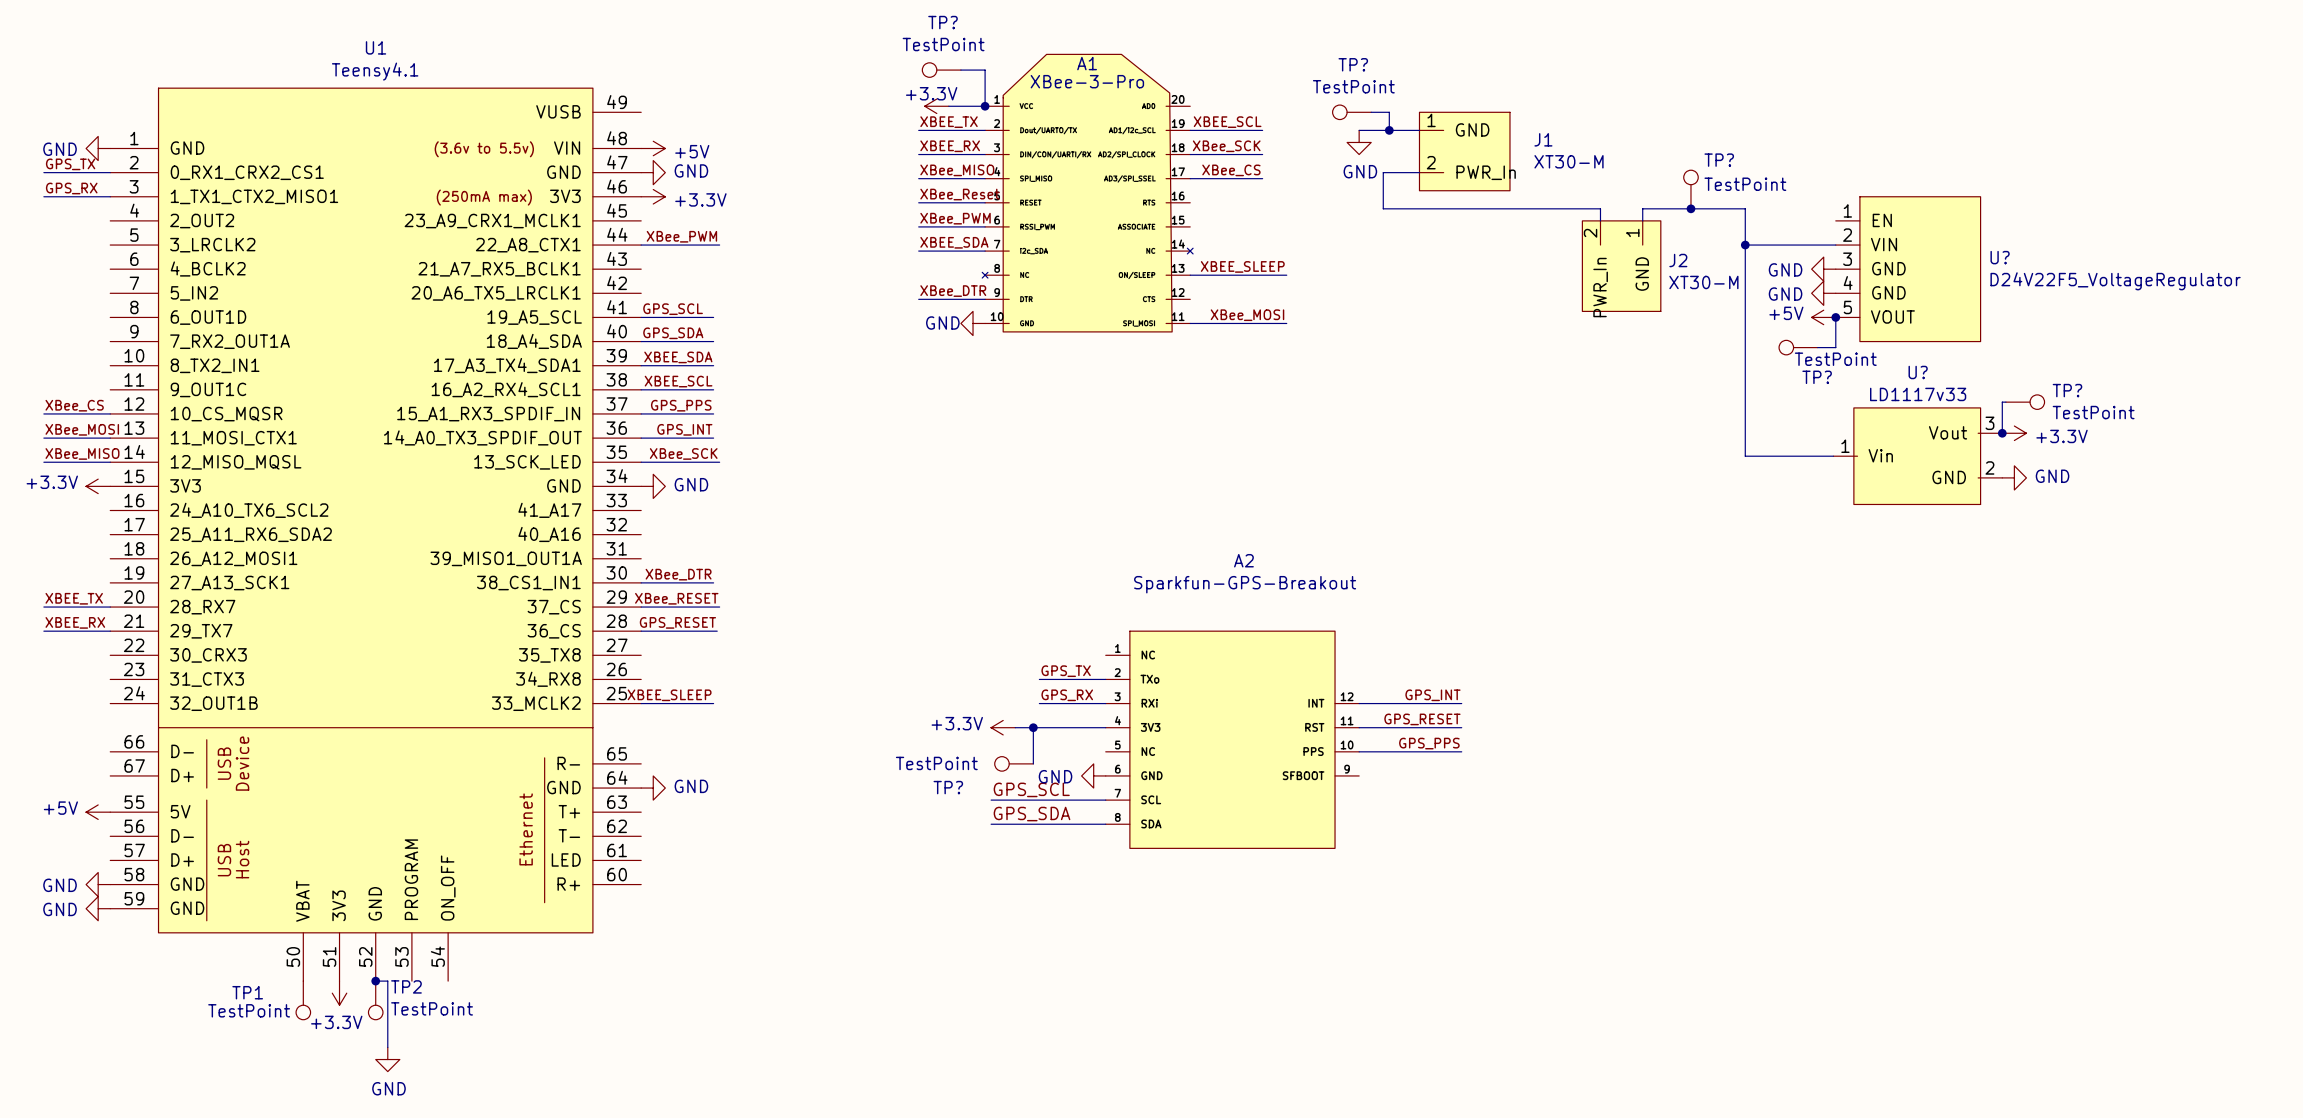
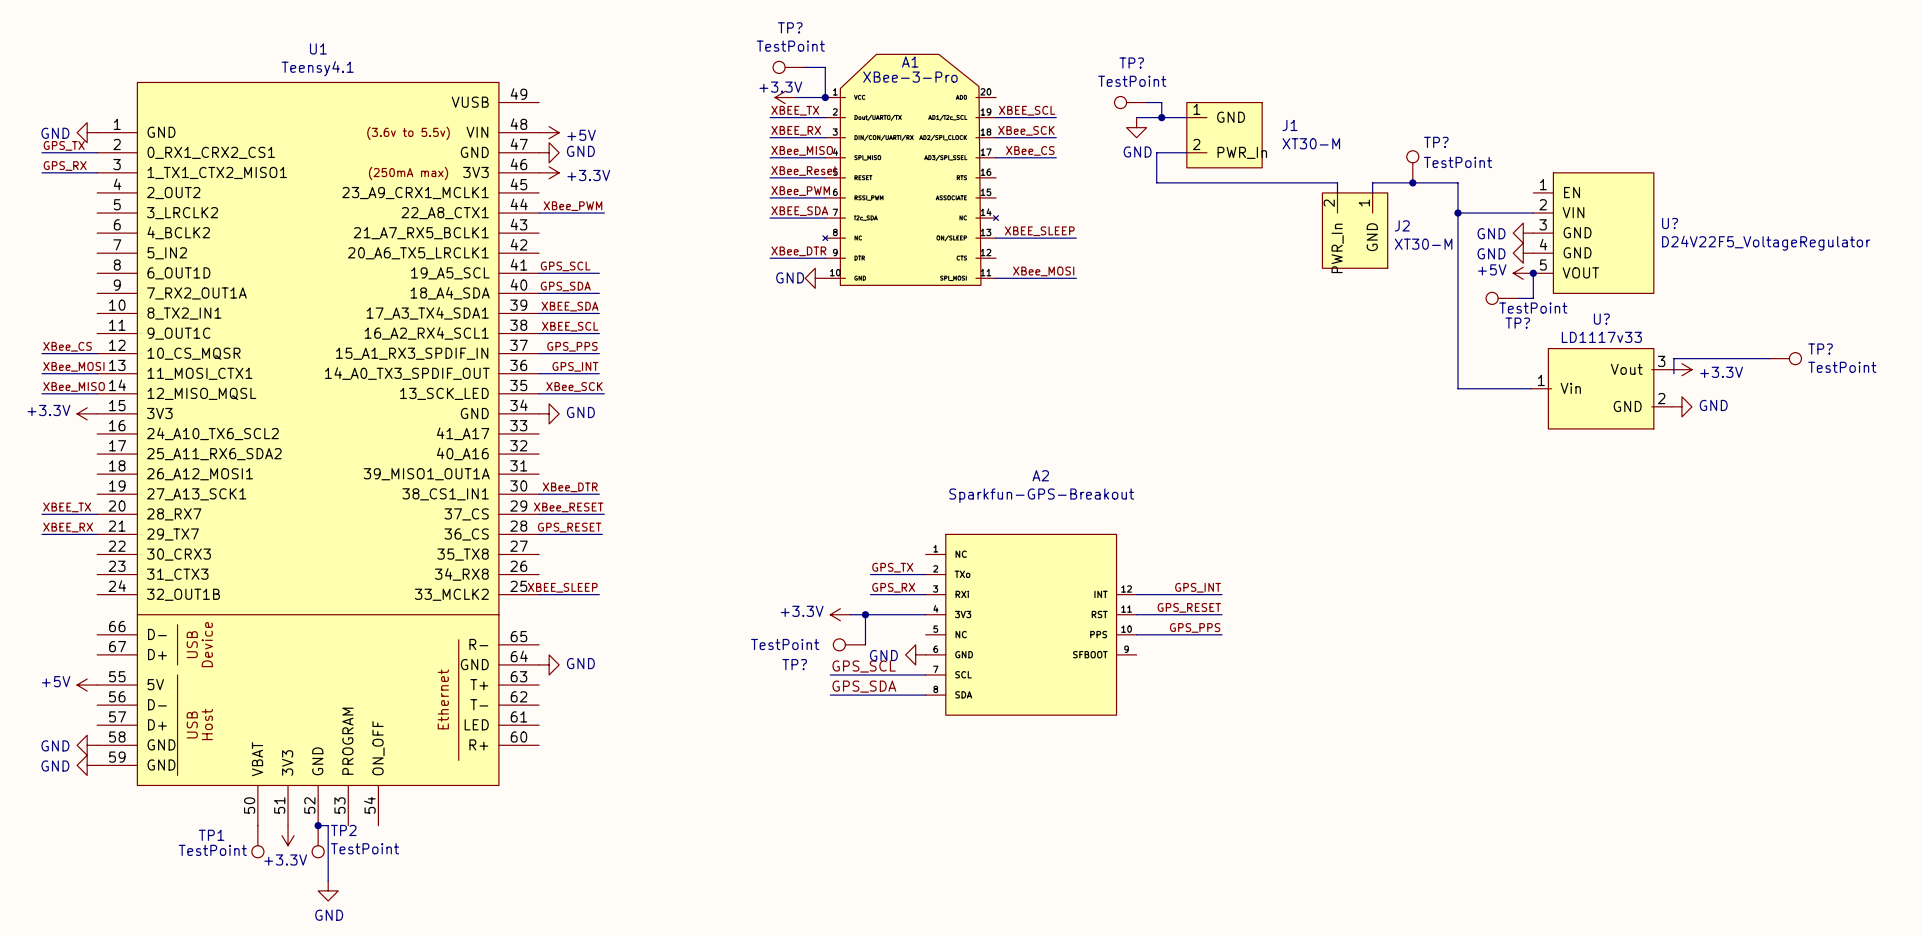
wire: (2005, 402) (2002, 402) (2002, 433) -> none
TP? position: (2025, 402) -> (1785, 358)
wire: none -> (1769, 358) (1673, 358) (1673, 373)
junction: (2002, 433) -> none

